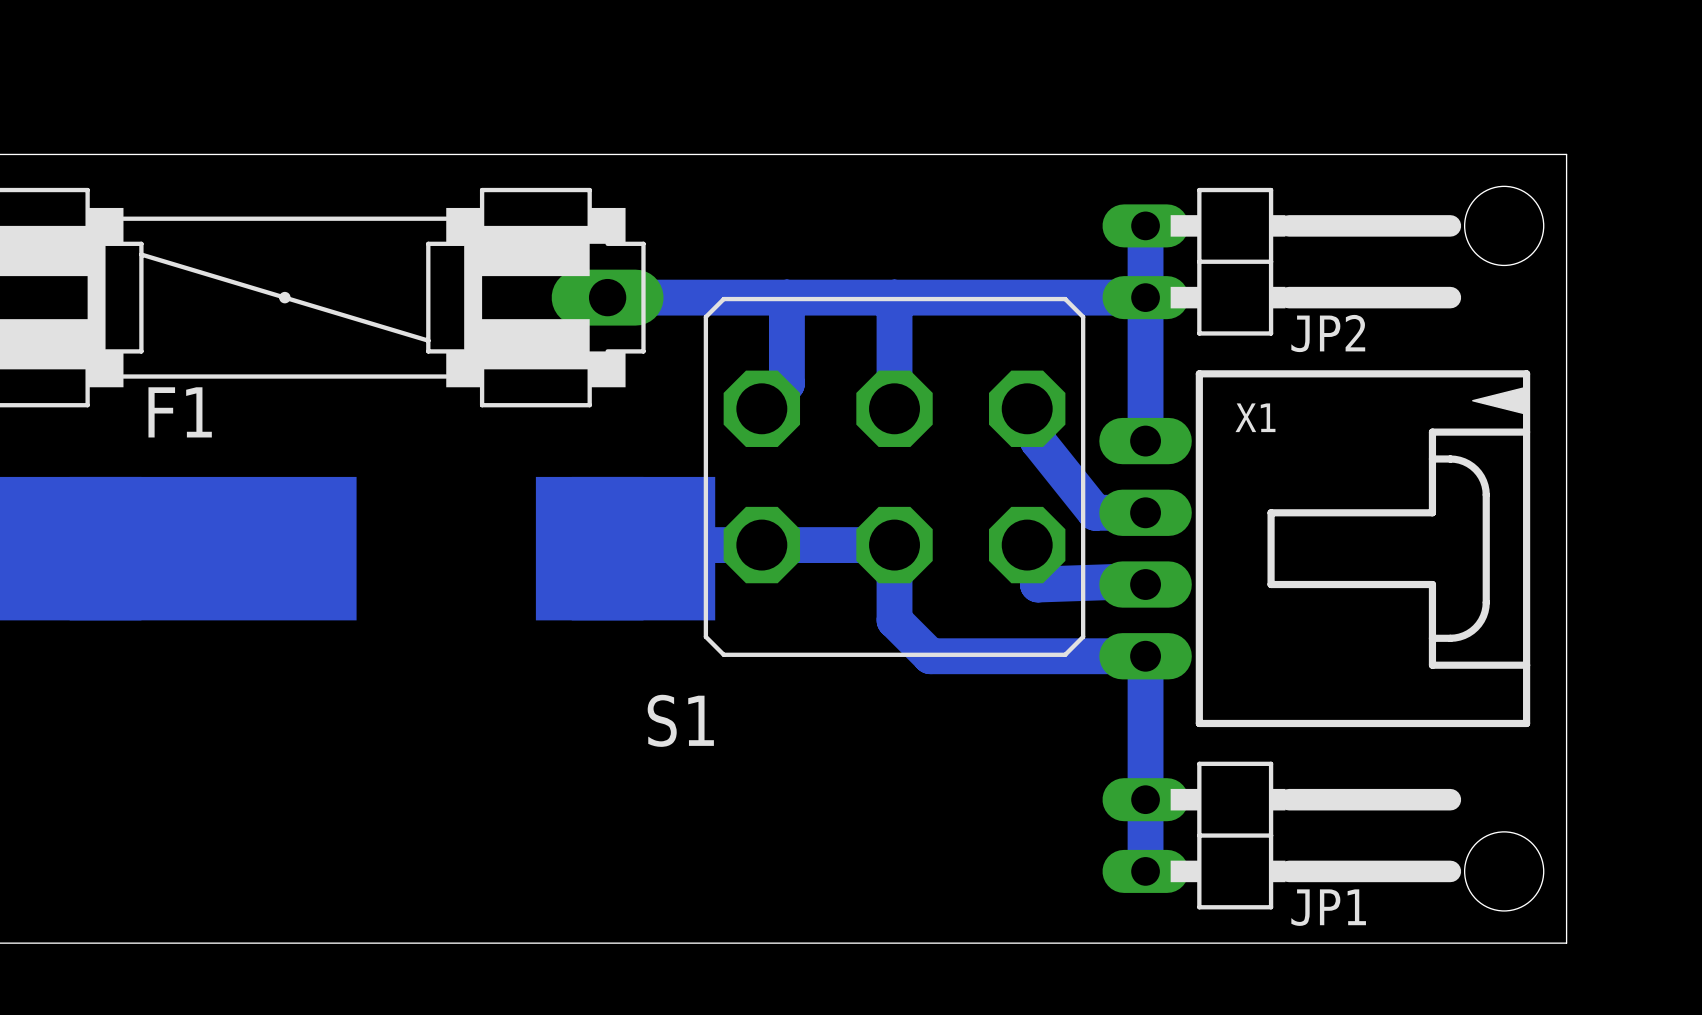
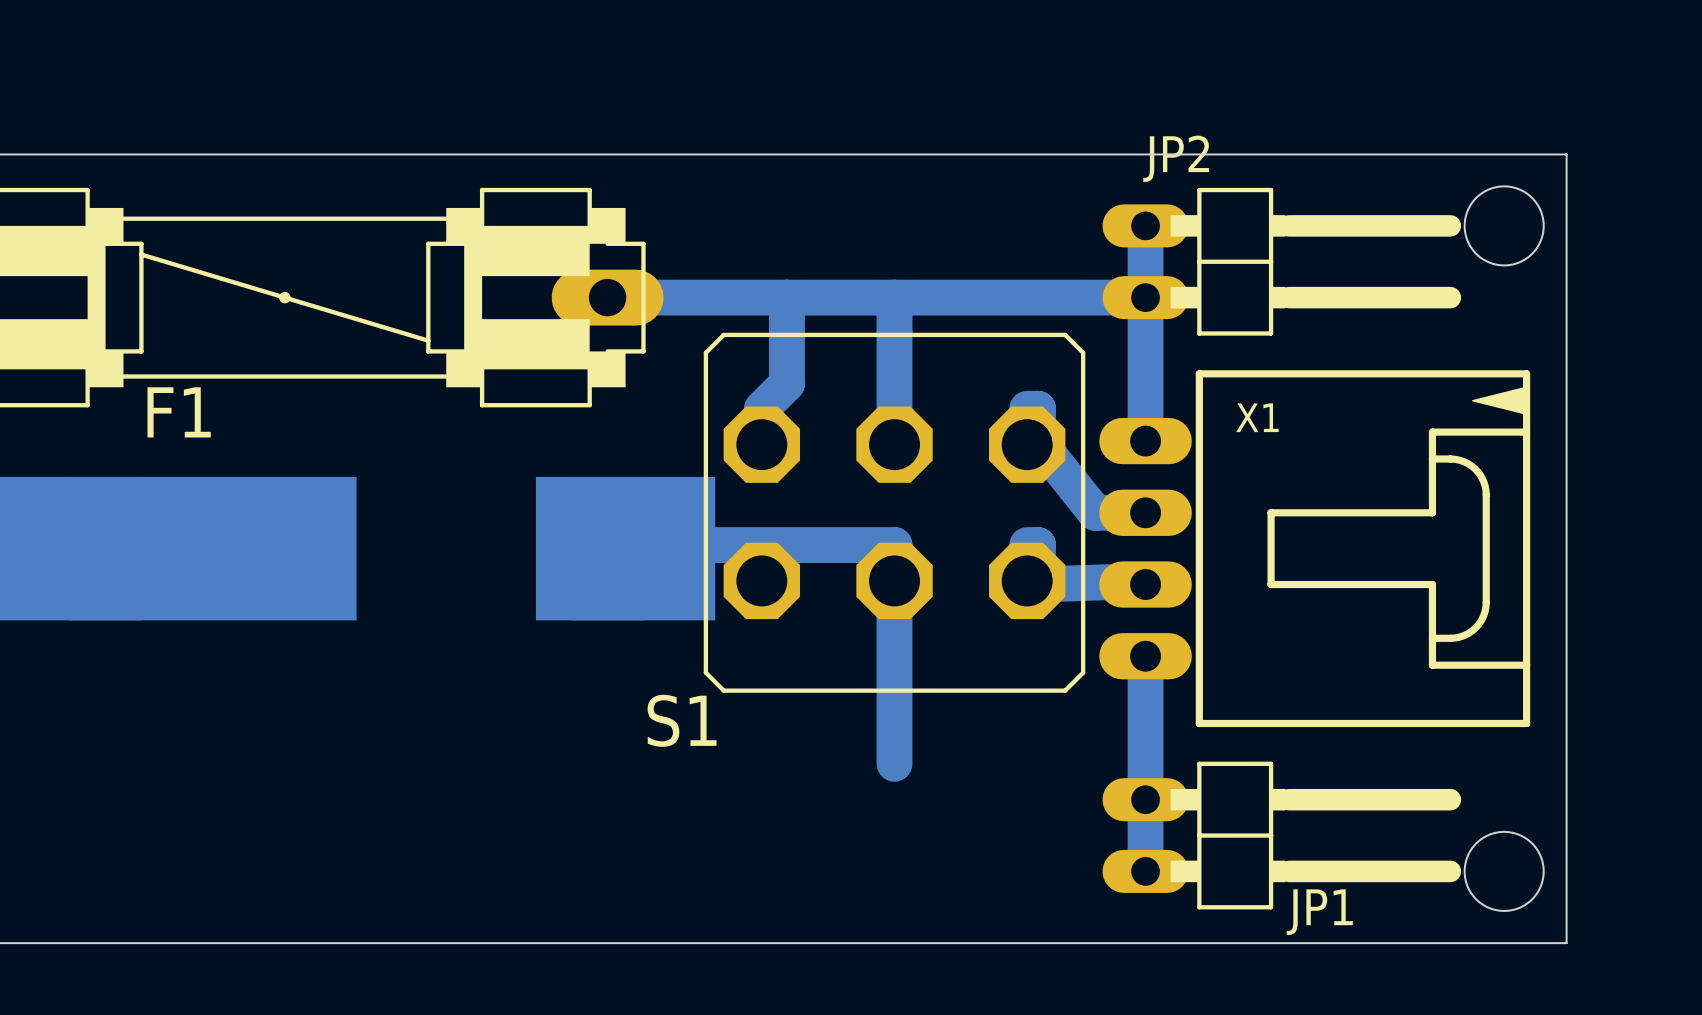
JP2 name position: JP2 (1328, 333) -> JP2 (1176, 158)
S1 position: (894, 476) -> (894, 512)
bottom track: (894, 620) (930, 656) (1145, 656) -> (894, 620) (894, 763)

